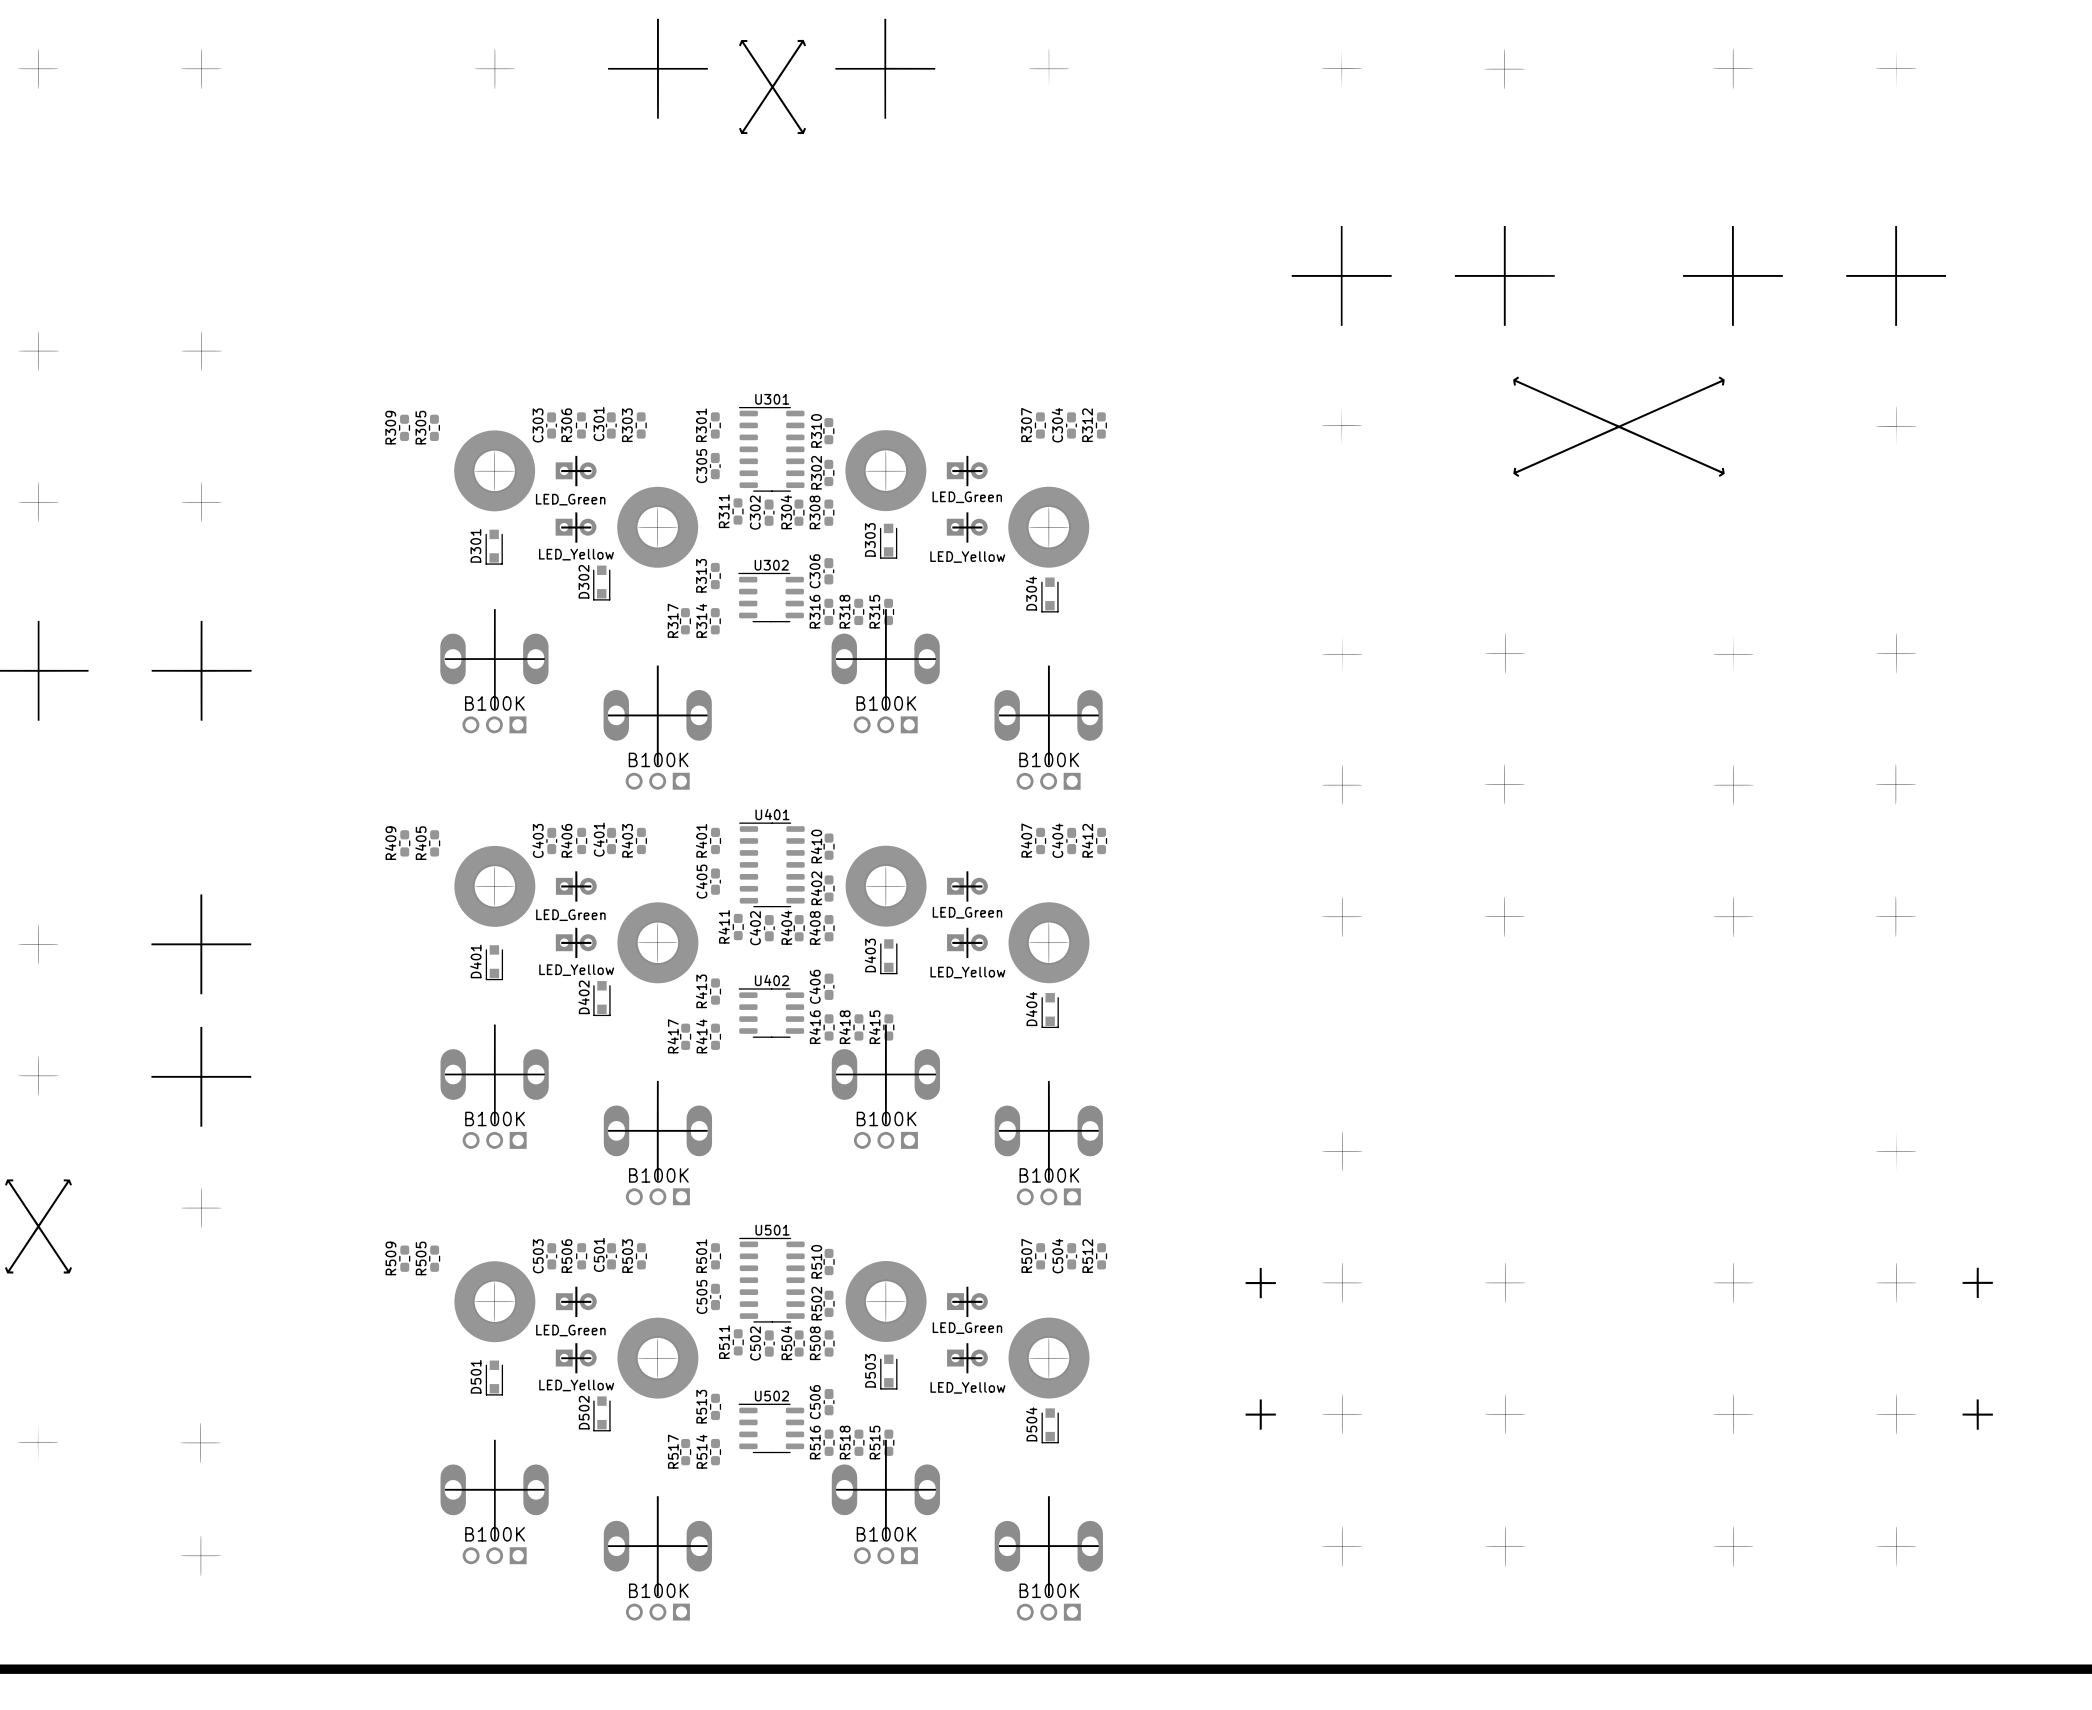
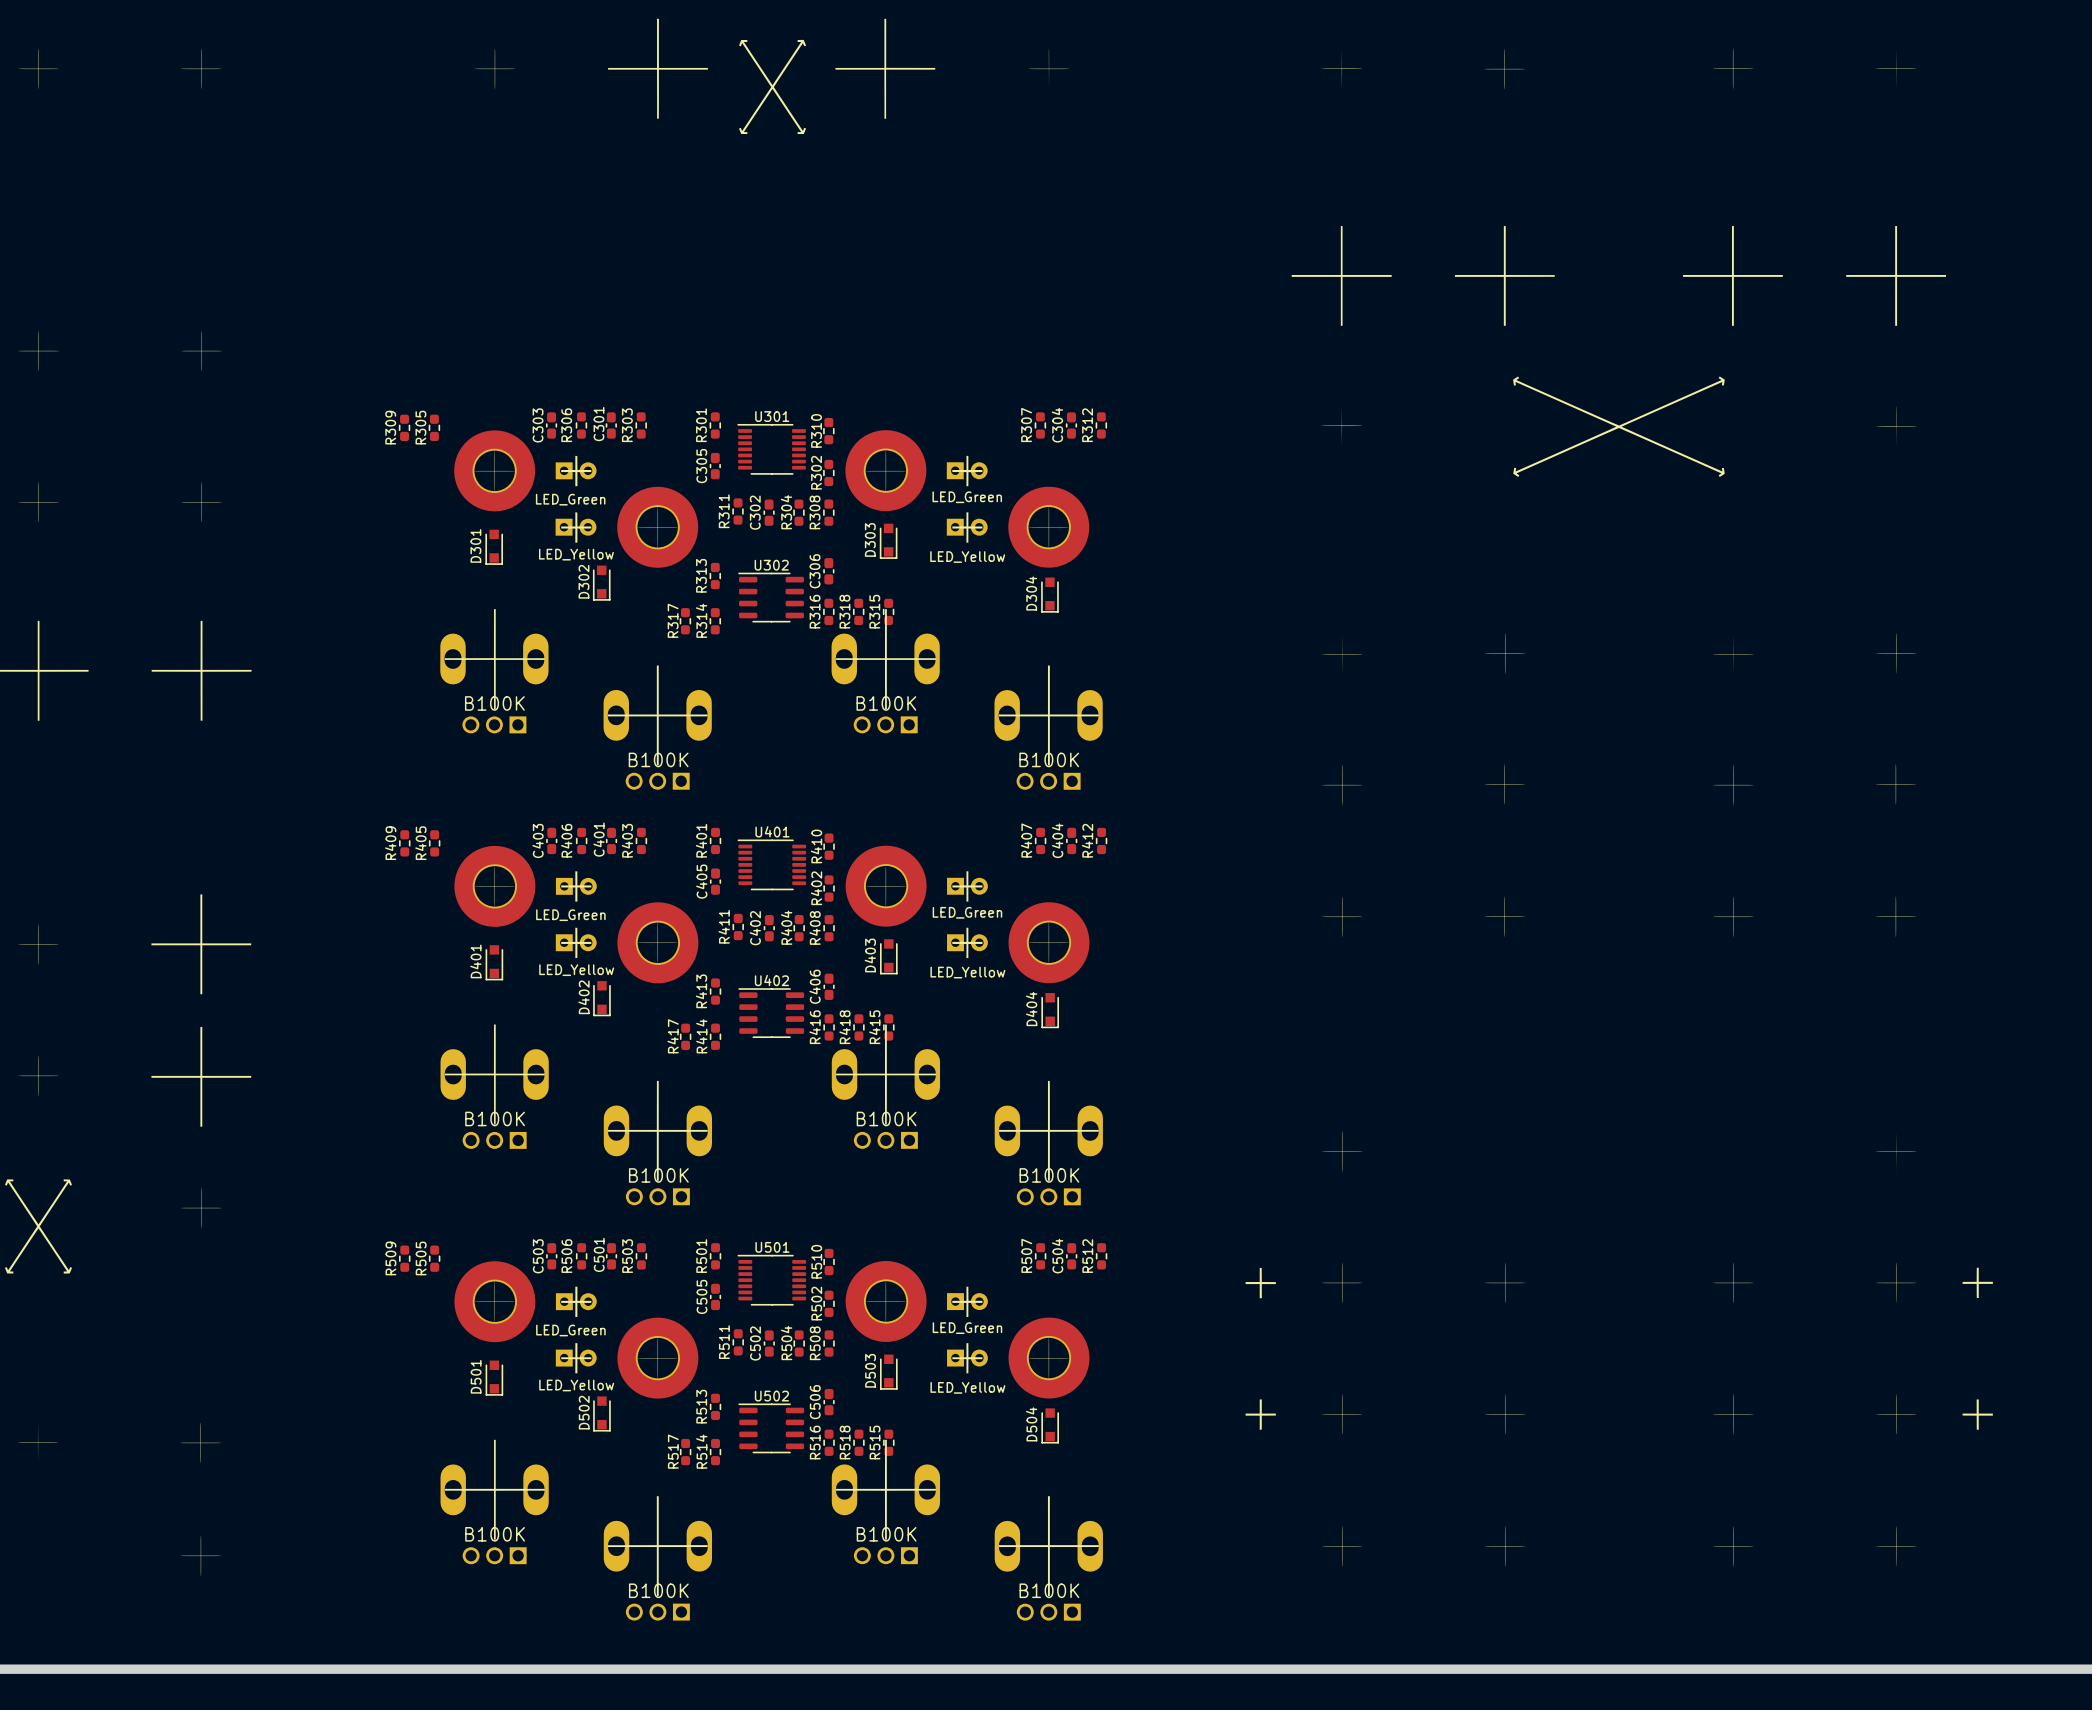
U301 footprint: [738, 407, 805, 492] -> [737, 424, 806, 475]
U401 footprint: [739, 822, 805, 908] -> [737, 839, 807, 891]
U501 footprint: [739, 1237, 805, 1323] -> [737, 1255, 807, 1306]

